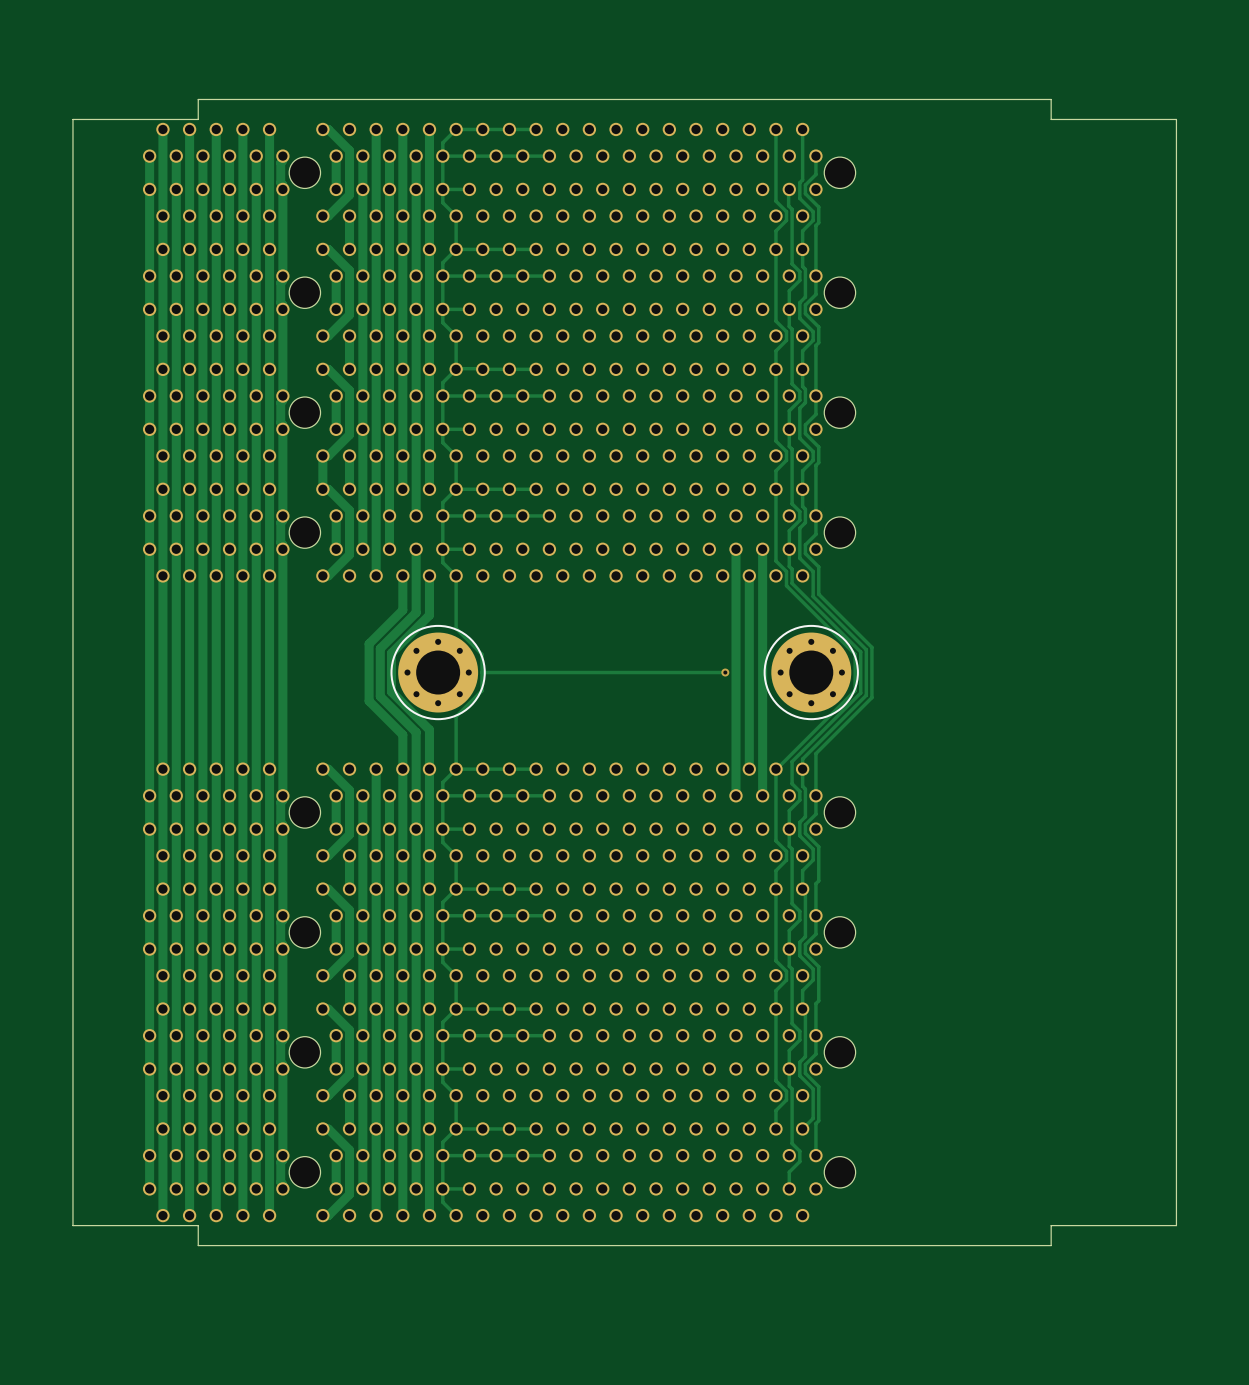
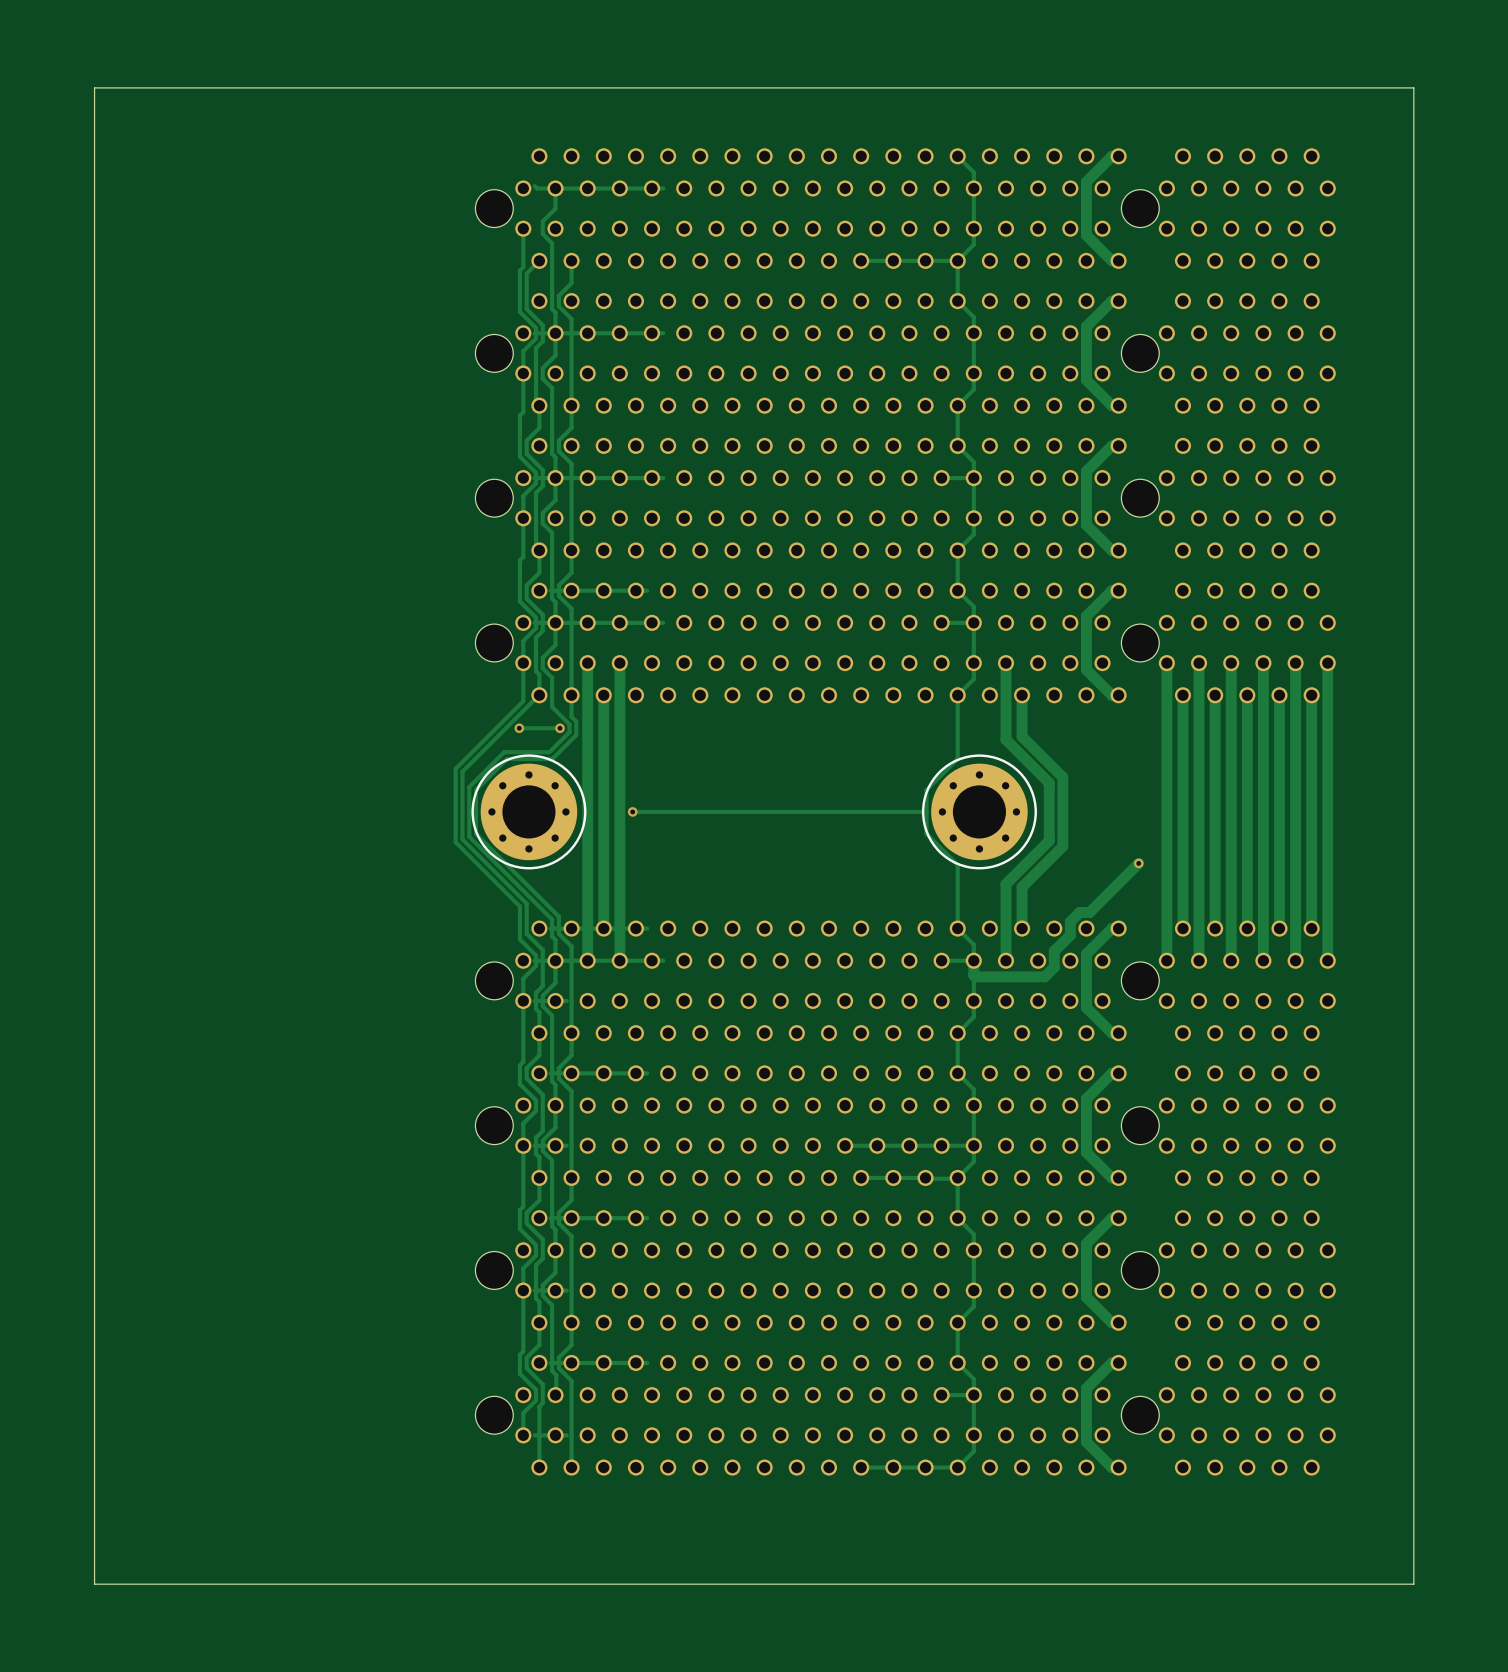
board edge: (1051, 99) (1051, 119) (1176, 119) (1176, 1225) (1051, 1225) (1051, 1245) (198, 1245) (198, 1225) (72, 1225) (72, 119) (198, 119) (198, 99) (1051, 99) -> (1413, 87) (1413, 1584) (94, 1584) (94, 87) (1413, 87)
track: (162, 129) (162, 1215) -> none
track: (189, 129) (189, 1215) -> none
track: (216, 129) (216, 1215) -> none
track: (242, 129) (242, 1215) -> none
track: (269, 129) (269, 1215) -> none
track: (322, 129) (328, 129) (349, 150) (349, 194) (328, 216) (322, 216) -> none
track: (376, 129) (376, 575) -> none
track: (402, 129) (402, 489) -> none
track: (429, 129) (429, 489) -> none
track: (536, 129) (456, 129) (442, 142) (442, 202) (456, 216) (456, 249) -> none
track: (775, 129) (775, 201) (786, 211) (786, 220) (775, 230) (775, 321) (786, 331) (786, 340) (775, 350) (775, 441) (786, 451) (786, 460) (775, 470) (775, 561) (786, 571) (786, 585) (855, 654) (855, 690) (775, 769) (775, 840) (786, 851) (786, 860) (775, 870) (775, 960) (786, 971) (786, 980) (775, 990) (775, 1080) (786, 1091) (786, 1100) (775, 1110) (775, 1128) -> none
track: none -> (957, 156) (973, 172) (973, 244) (957, 260)
track: (802, 129) (802, 179) (799, 182) (799, 198) (813, 211) (813, 220) (802, 230) (802, 266) (805, 269) (805, 297) (799, 302) (799, 318) (813, 331) (813, 340) (802, 350) (802, 386) (805, 389) (805, 402) (799, 408) (799, 438) (813, 451) (813, 460) (802, 470) (802, 506) (805, 509) (805, 522) (799, 528) (799, 558) (813, 571) (813, 596) (866, 649) (866, 695) (802, 759) (805, 816) (799, 822) (799, 835) (813, 849) (813, 860) (802, 870) (802, 889) (805, 891) (805, 936) (799, 942) (799, 955) (813, 969) (813, 980) (802, 990) (802, 1009) (805, 1011) (805, 1056) (799, 1062) (799, 1075) (813, 1089) (813, 1118) (802, 1128) -> none
track: none -> (1118, 156) (1111, 156) (1086, 181) (1086, 235) (1111, 260) (1118, 260)
track: (149, 156) (149, 1188) -> none
track: (176, 156) (176, 1188) -> none
track: (202, 156) (202, 1188) -> none
track: (229, 156) (229, 1188) -> none
track: (256, 156) (256, 1188) -> none
track: (282, 156) (280, 162) (280, 182) (282, 184) (282, 280) (280, 282) (280, 302) (282, 304) (282, 400) (280, 402) (280, 422) (282, 424) (282, 520) (280, 522) (280, 542) (282, 544) (282, 800) (280, 802) (280, 822) (282, 824) (282, 920) (280, 922) (280, 942) (282, 944) (282, 1040) (280, 1042) (280, 1062) (282, 1064) (282, 1160) (280, 1162) (280, 1182) (282, 1188) -> none
track: (336, 156) (336, 189) -> none
track: (362, 156) (362, 549) -> none
track: (389, 156) (389, 549) -> none
track: (416, 156) (416, 515) -> none
track: none -> (555, 188) (555, 208) (542, 221) (542, 233) (552, 243) (552, 309) (555, 312) (555, 355) (542, 368) (542, 378) (552, 388) (552, 453) (555, 457) (555, 500) (542, 513) (542, 523) (552, 532) (552, 598) (555, 602) (555, 645) (542, 657) (542, 668) (552, 677) (552, 706) (569, 724) (569, 732) (549, 752) (504, 752) (469, 787) (469, 836) (552, 919) (552, 936) (555, 940) (555, 982) (542, 995) (542, 1006) (552, 1015) (552, 1081) (555, 1084) (555, 1127) (542, 1140) (542, 1151) (552, 1160) (552, 1226) (555, 1229) (555, 1272) (542, 1285) (542, 1295) (552, 1305) (552, 1371) (556, 1375) (555, 1395)
track: (815, 156) (815, 174) (805, 185) (805, 193) (818, 207) (818, 222) (815, 225) (815, 294) (805, 305) (805, 313) (818, 327) (818, 342) (815, 345) (815, 414) (805, 424) (805, 433) (818, 447) (818, 462) (815, 465) (815, 534) (805, 544) (805, 553) (818, 566) (818, 594) (871, 647) (871, 697) (815, 753) (815, 814) (805, 824) (805, 833) (818, 846) (818, 880) (815, 883) (815, 934) (805, 944) (805, 953) (818, 966) (818, 1000) (815, 1003) (815, 1054) (805, 1064) (805, 1073) (818, 1086) (815, 1155) -> none
part: (499, 172) -> none
part: none -> (905, 208)
track: none -> (523, 228) (523, 267) (519, 270) (519, 311) (536, 328) (536, 338) (523, 351) (523, 412) (519, 415) (519, 456) (536, 472) (536, 483) (523, 496) (523, 557) (519, 560) (519, 601) (536, 617) (536, 628) (523, 640) (523, 701) (455, 768) (455, 842) (519, 906) (519, 939) (536, 955) (536, 966) (523, 978) (523, 1061) (519, 1065) (519, 1084) (536, 1100) (536, 1110) (523, 1123) (523, 1206) (519, 1210) (519, 1228) (536, 1245) (536, 1255) (523, 1268) (523, 1351) (519, 1354) (519, 1373) (536, 1389) (536, 1400) (523, 1413) (523, 1435)
track: (469, 189) (442, 189) -> none
track: (789, 189) (788, 205) (792, 209) (792, 263) (799, 271) (799, 280) (789, 290) (789, 326) (792, 329) (792, 383) (799, 391) (799, 400) (789, 410) (789, 446) (792, 449) (792, 503) (799, 511) (799, 520) (789, 530) (789, 566) (792, 569) (792, 583) (860, 652) (860, 693) (792, 761) (792, 783) (799, 791) (799, 800) (789, 810) (789, 846) (792, 849) (792, 903) (799, 911) (799, 920) (789, 930) (789, 966) (792, 969) (792, 1023) (799, 1031) (799, 1040) (789, 1050) (789, 1086) (792, 1088) (792, 1143) (799, 1151) (799, 1161) (789, 1172) (789, 1188) -> none
track: (349, 216) (349, 249) -> none
track: none -> (539, 260) (526, 273) (526, 309) (542, 325) (542, 341) (536, 348) (536, 402) (539, 405) (539, 427) (526, 440) (526, 453) (542, 470) (542, 486) (536, 492) (536, 547) (539, 550) (539, 572) (526, 585) (526, 598) (542, 614) (542, 630) (536, 637) (536, 671) (539, 674) (539, 695) (462, 771) (462, 839) (526, 903) (526, 933) (542, 949) (542, 986) (536, 992) (536, 1009) (539, 1012) (539, 1055) (526, 1068) (526, 1078) (542, 1094) (542, 1130) (536, 1137) (536, 1153) (539, 1157) (539, 1200) (526, 1212) (526, 1223) (542, 1239) (542, 1258) (536, 1265) (536, 1298) (539, 1302) (539, 1345) (526, 1357) (526, 1368) (542, 1384) (542, 1403) (539, 1406) (539, 1467)
track: none -> (571, 260) (571, 283) (558, 295) (558, 306) (571, 319) (571, 427) (558, 440) (558, 451) (571, 463) (571, 572) (558, 585) (558, 595) (571, 608) (571, 716) (576, 721) (576, 734) (552, 758) (507, 758) (476, 790) (476, 833) (558, 916) (558, 933) (571, 946) (571, 1055) (558, 1068) (558, 1078) (571, 1091) (571, 1200) (558, 1212) (558, 1223) (571, 1236) (571, 1345) (558, 1357) (558, 1368) (571, 1380) (571, 1467)
track: none -> (957, 260) (957, 301) (973, 317) (973, 389) (957, 405) (957, 445) (973, 461) (973, 534) (957, 550) (957, 590) (973, 606) (973, 679) (957, 695) (957, 758) (926, 790) (926, 833) (957, 865) (957, 928) (973, 944) (973, 1017) (957, 1033) (957, 1073) (973, 1089) (973, 1161) (957, 1177) (957, 1218) (973, 1234) (973, 1306) (957, 1322) (957, 1362) (973, 1379) (973, 1451) (957, 1467) (861, 1467)
track: (322, 249) (328, 249) (349, 270) (349, 314) (328, 336) (322, 336) -> none
track: (456, 249) (442, 262) (442, 322) (456, 336) (456, 369) (442, 382) (442, 442) (456, 455) (456, 489) (442, 502) (442, 562) (456, 575) (456, 628) (481, 654) (481, 690) (456, 716) (456, 769) (442, 782) (442, 842) (456, 855) (456, 889) (442, 902) (442, 962) (456, 975) (456, 1009) (442, 1022) (442, 1082) (456, 1095) (456, 1128) (442, 1142) (442, 1202) (456, 1215) -> none
track: (536, 249) (456, 249) -> (957, 260) (861, 260)
track: none -> (1118, 301) (1111, 301) (1086, 326) (1086, 380) (1111, 405) (1118, 405)
track: (336, 276) (336, 309) -> none
part: (499, 292) -> none
part: none -> (905, 353)
track: (469, 309) (442, 309) -> none
track: (349, 336) (349, 369) -> none
track: (456, 368) (536, 369) -> none
track: (322, 369) (328, 369) (349, 390) (349, 434) (328, 455) (322, 455) (322, 489) (328, 489) (349, 510) (349, 554) (328, 575) (322, 575) -> none
track: none -> (1118, 445) (1111, 445) (1086, 471) (1086, 524) (1111, 550) (1118, 550)
track: (336, 396) (336, 429) -> none
track: none -> (973, 478) (941, 478)
part: (499, 412) -> none
part: none -> (905, 498)
track: (469, 429) (442, 429) -> none
track: (349, 455) (349, 489) -> none
track: none -> (1118, 590) (1111, 590) (1086, 616) (1086, 669) (1111, 695) (1118, 695)
track: (336, 515) (336, 549) -> none
track: none -> (973, 622) (941, 622)
part: (499, 532) -> none
part: none -> (905, 642)
track: (416, 549) (416, 612) (380, 648) (380, 696) (416, 732) (416, 1188) -> none
track: (469, 549) (442, 549) -> none
track: none -> (587, 663) (587, 960)
track: none -> (619, 663) (619, 960)
track: (735, 549) (735, 795) -> (1166, 663) (1166, 960)
track: (762, 549) (762, 795) -> (1199, 663) (1199, 960)
track: none -> (1005, 663) (1005, 739) (1049, 783) (1049, 840) (1005, 884) (1005, 960)
track: none -> (1231, 663) (1231, 960)
track: none -> (1263, 663) (1263, 960)
track: none -> (1295, 663) (1295, 960)
track: none -> (1327, 663) (1327, 960)
track: (402, 575) (402, 610) (369, 643) (369, 701) (402, 734) (402, 1215) -> none
track: (429, 575) (429, 615) (391, 653) (391, 691) (429, 729) (429, 1215) -> none
track: none -> (603, 695) (603, 928)
track: (749, 575) (749, 769) -> (1182, 695) (1182, 928)
track: none -> (1022, 695) (1022, 736) (1062, 777) (1062, 846) (1022, 887) (1022, 928)
track: none -> (1215, 695) (1215, 928)
track: none -> (1247, 695) (1247, 928)
track: none -> (1279, 695) (1279, 928)
track: none -> (1311, 695) (1311, 928)
via: none -> (519, 728)
track: none -> (560, 728) (519, 728)
via: none -> (560, 728)
track: (524, 672) (481, 672) -> (926, 811) (875, 811)
via: none -> (632, 811)
via: (725, 672) -> none
track: none -> (1138, 863) (1089, 912) (1079, 912) (1070, 921) (1070, 935) (1054, 951) (1054, 967) (1044, 976) (975, 976) (973, 960) (941, 960)
via: none -> (1138, 863)
track: (322, 769) (328, 769) (349, 790) (349, 834) (328, 855) (322, 855) -> none
track: (376, 769) (376, 1215) -> none
track: none -> (1118, 928) (1111, 928) (1086, 954) (1086, 1007) (1111, 1033) (1118, 1033)
track: (336, 795) (336, 829) -> none
track: (362, 795) (362, 1188) -> none
track: (389, 795) (389, 1188) -> none
part: (499, 812) -> none
part: none -> (905, 980)
track: (349, 855) (349, 889) -> none
track: (322, 889) (328, 889) (349, 910) (349, 954) (328, 975) (322, 975) -> none
track: none -> (1118, 1073) (1111, 1073) (1086, 1098) (1086, 1152) (1111, 1177) (1118, 1177)
track: (336, 915) (336, 949) -> none
track: (549, 915) (442, 915) -> (973, 1145) (845, 1145)
part: (499, 932) -> none
part: none -> (905, 1125)
track: (349, 975) (349, 1009) -> none
track: none -> (861, 1177) (957, 1178)
track: (322, 1009) (328, 1009) (349, 1030) (349, 1074) (328, 1095) (322, 1095) -> none
track: none -> (1118, 1218) (1111, 1218) (1086, 1243) (1086, 1297) (1111, 1322) (1118, 1322)
track: (336, 1035) (336, 1069) -> none
track: (549, 1035) (442, 1035) -> none
part: (499, 1052) -> none
part: none -> (905, 1270)
track: (349, 1095) (349, 1128) -> none
track: (322, 1128) (328, 1128) (349, 1150) (349, 1194) (328, 1215) (322, 1215) -> none
track: none -> (1118, 1362) (1111, 1362) (1086, 1388) (1086, 1442) (1111, 1467) (1118, 1467)
track: (336, 1155) (336, 1188) -> none
track: (549, 1155) (442, 1155) -> none
track: none -> (973, 1395) (941, 1395)
part: (499, 1172) -> none
part: none -> (905, 1415)

